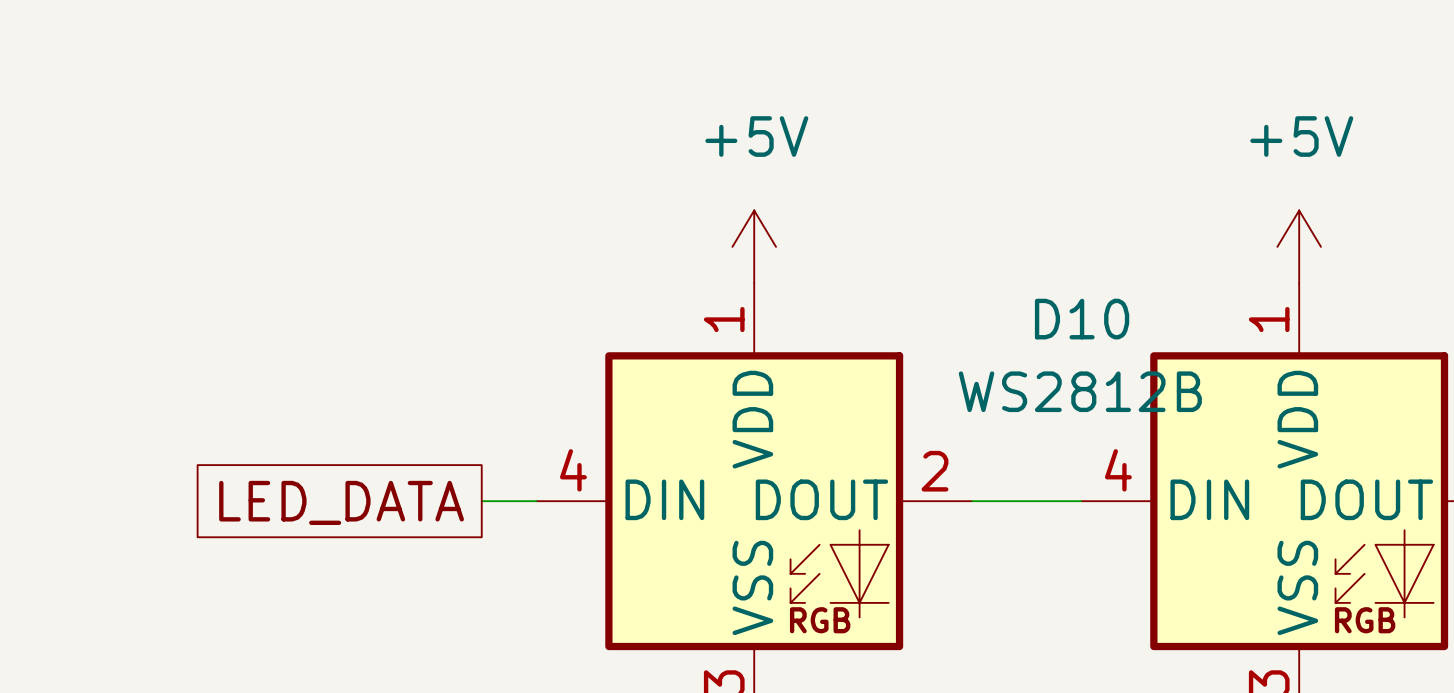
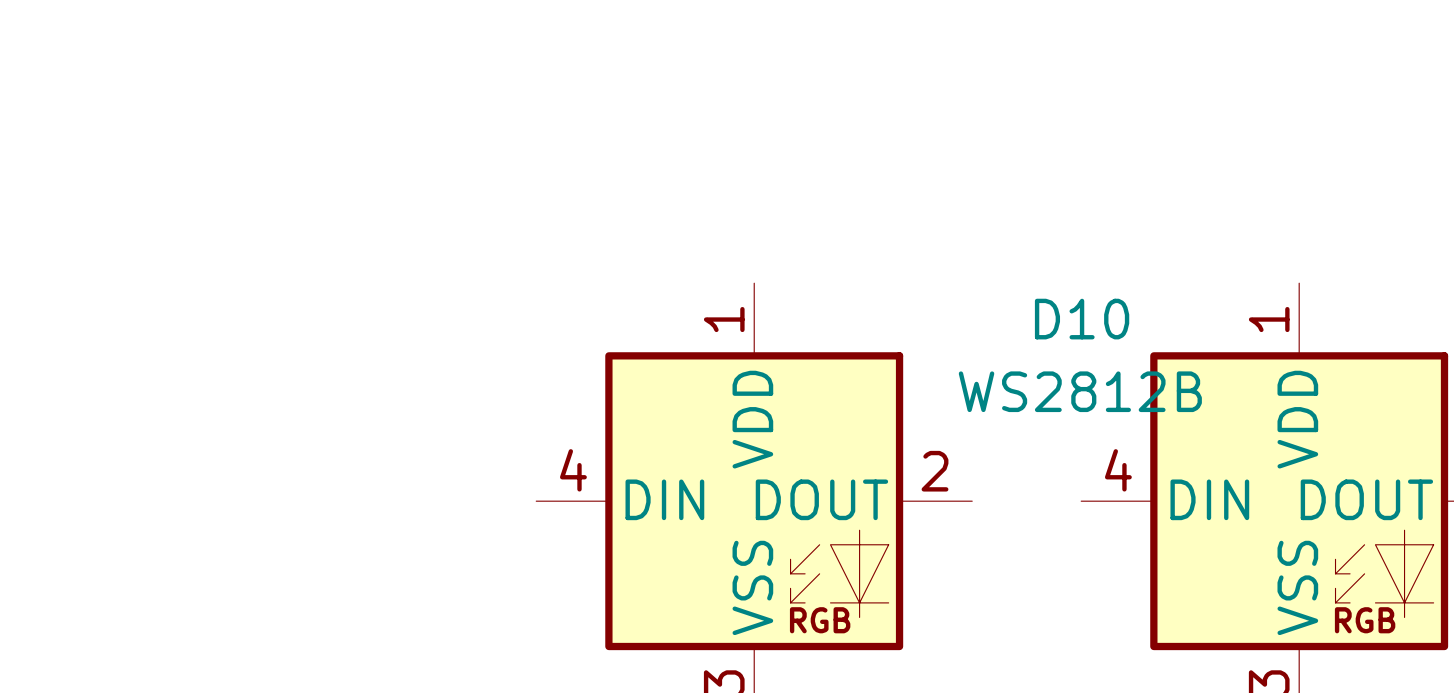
power symbol: +5V (754, 246) -> none
power symbol: +5V (1299, 246) -> none
wire: (481, 501) (536, 501) -> none
wire: (972, 501) (1081, 501) -> none
global label: LED_DATA (341, 502) -> none

